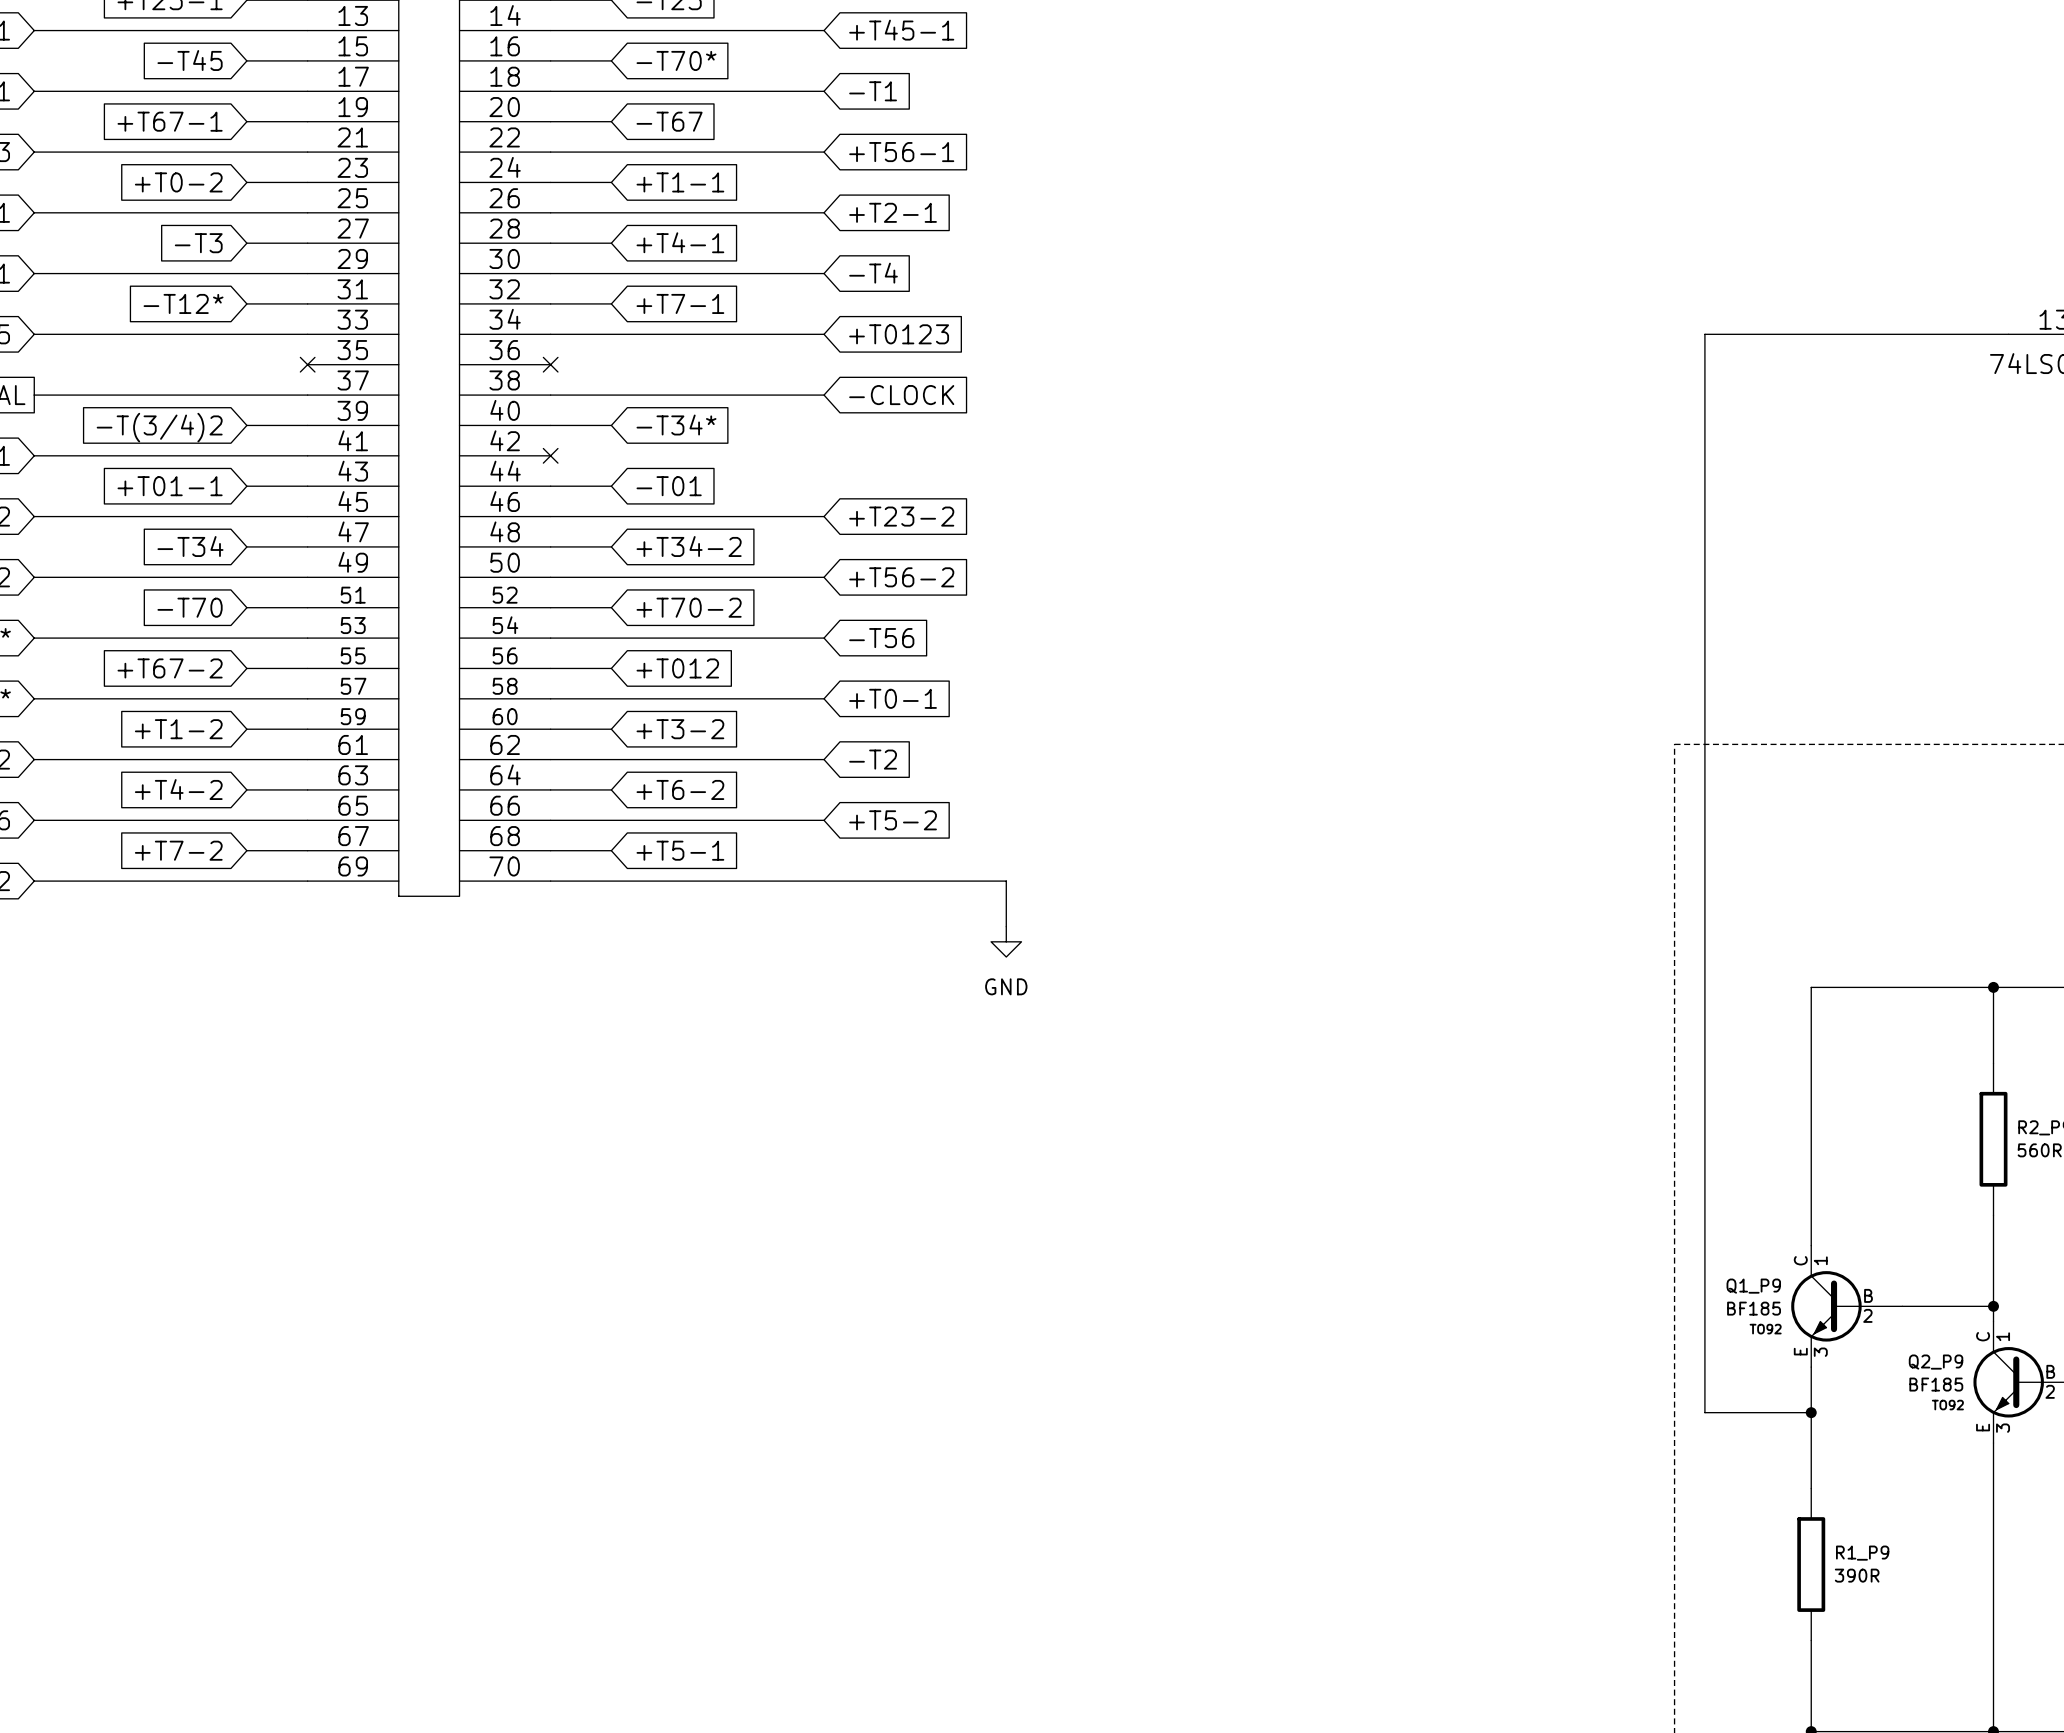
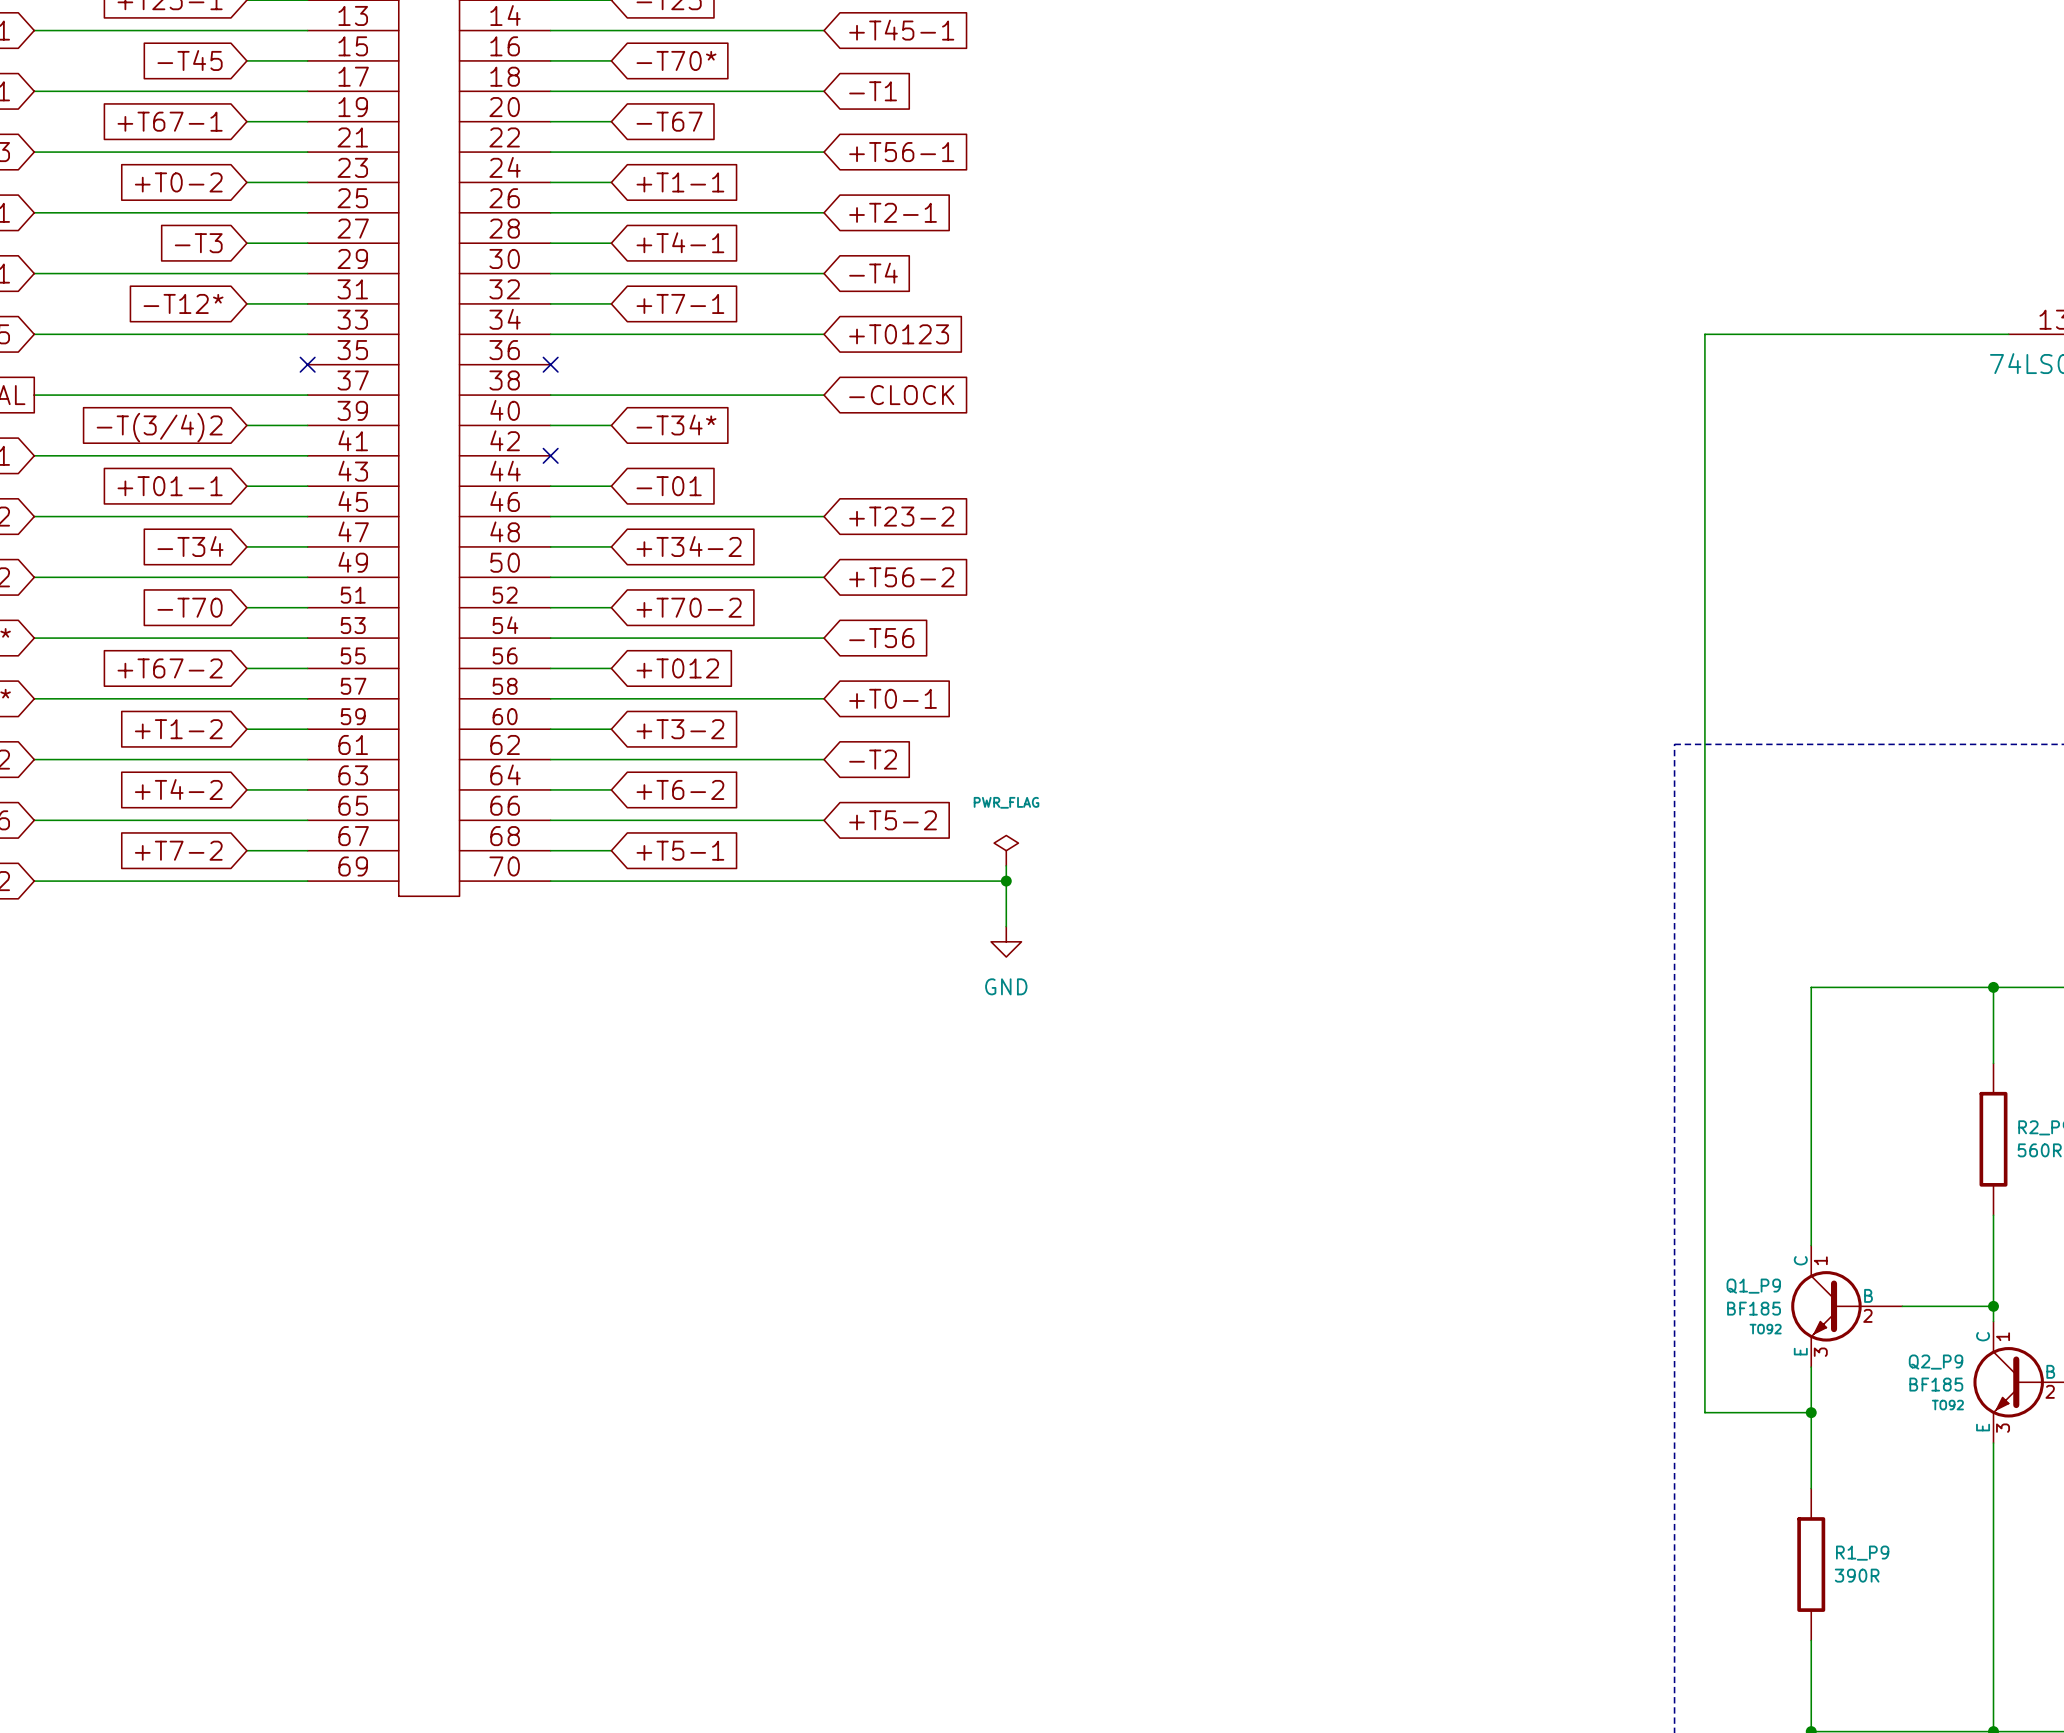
power symbol: none -> PWR_FLAG (1006, 850)
wire: none -> (1006, 865) (1006, 881)
junction: none -> (1006, 881)

